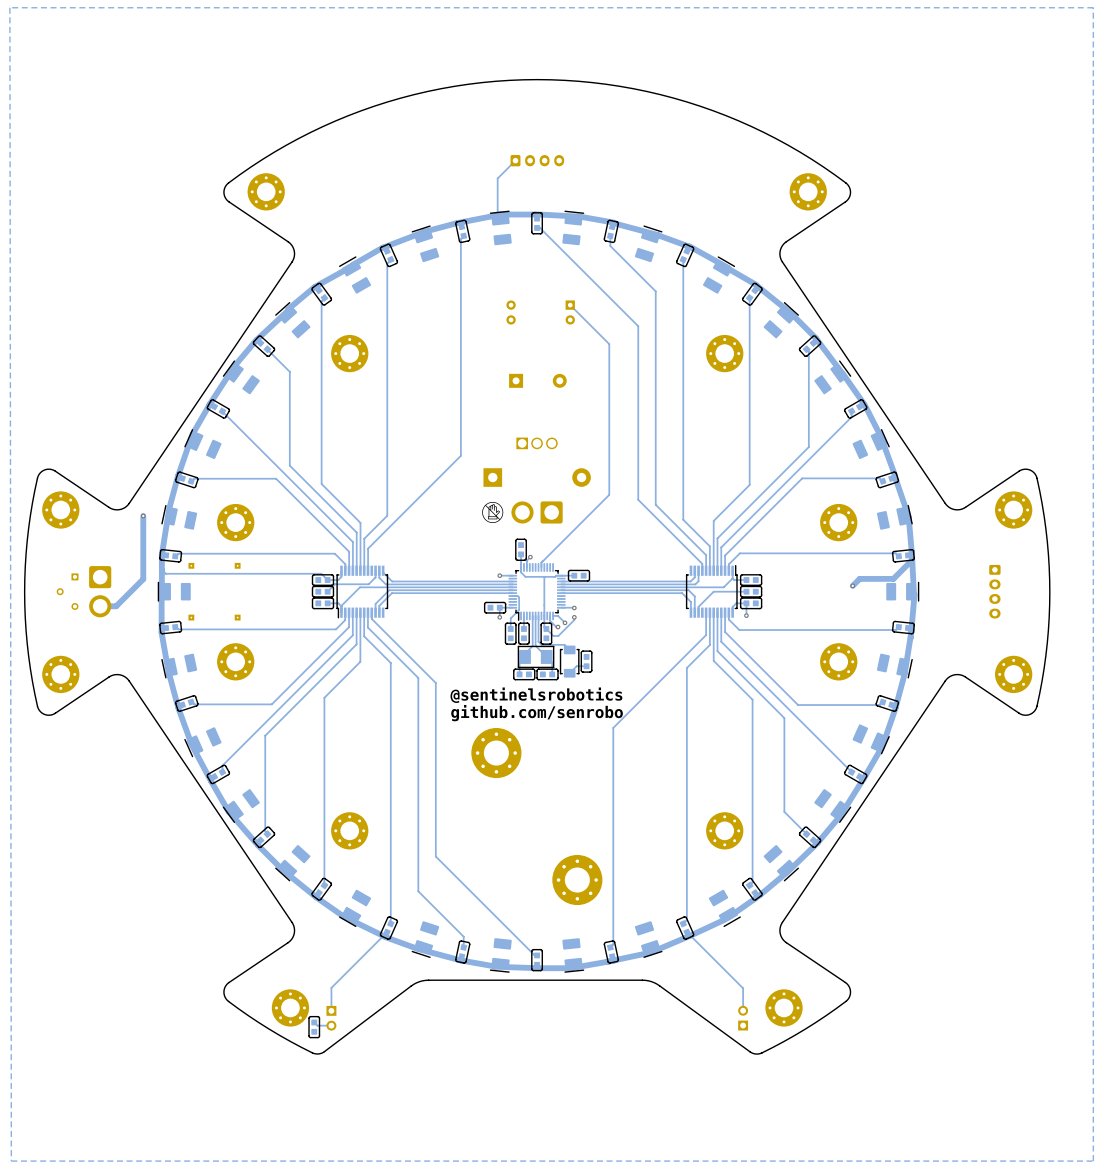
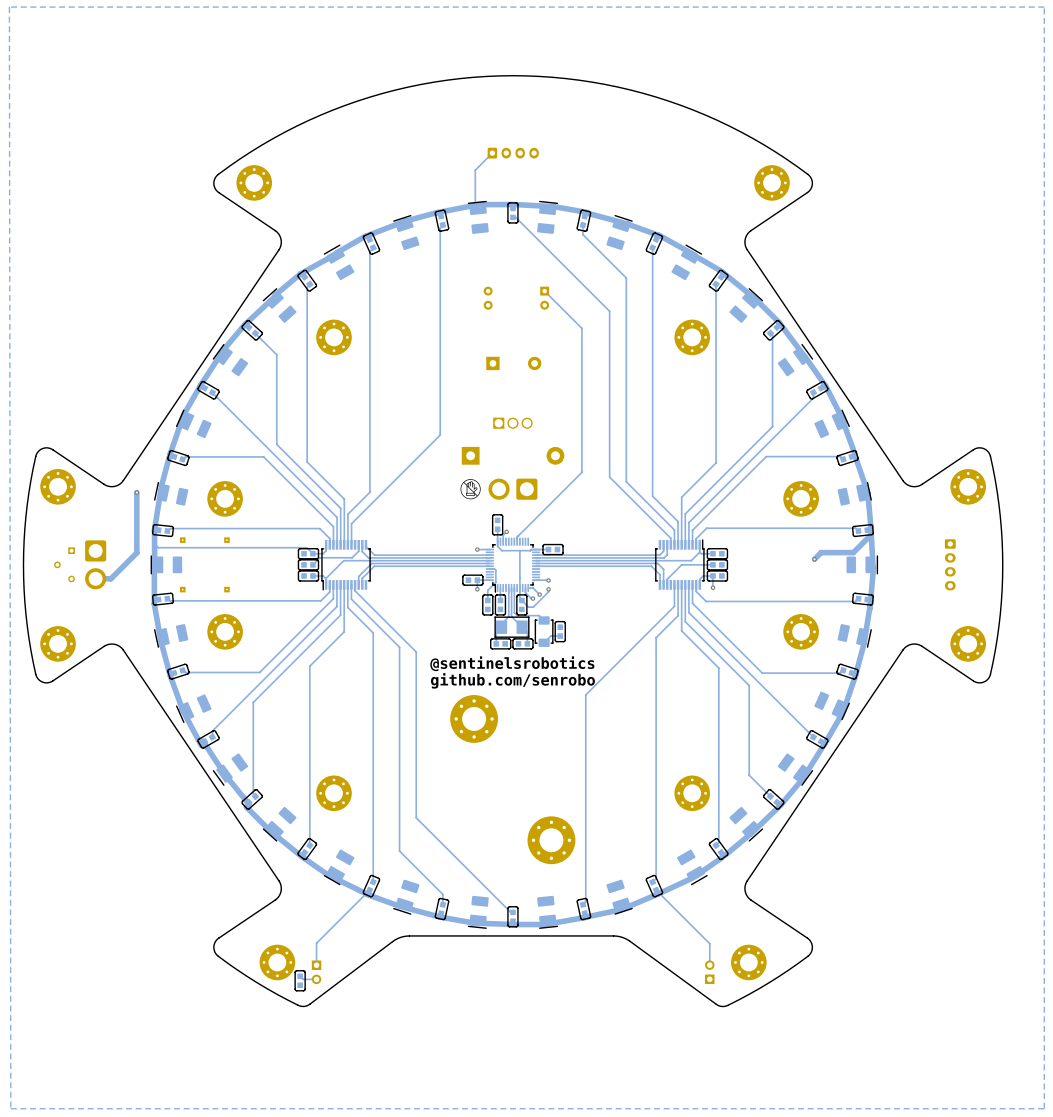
track: none -> (202, 741) (225, 776)
track: (211, 781) (228, 811) -> none
track: none -> (222, 771) (249, 804)
track: (228, 811) (257, 844) -> none

